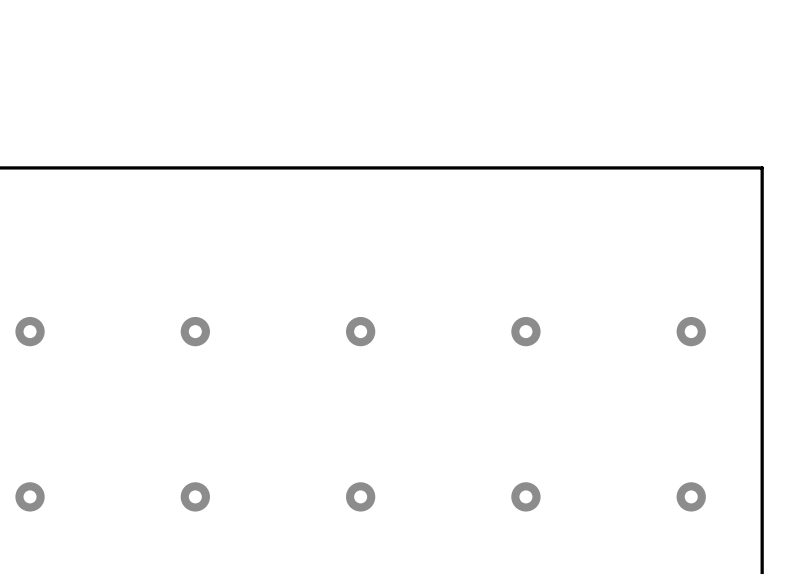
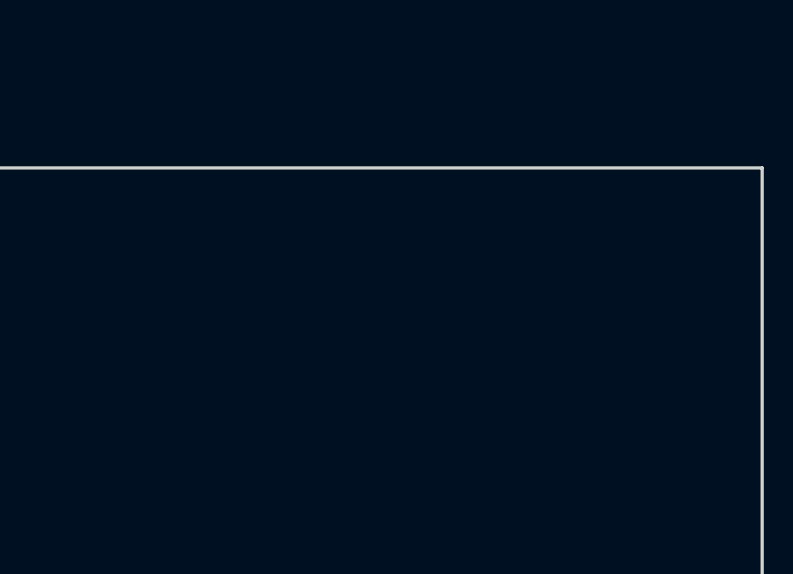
via: (30, 331) -> none
via: (195, 331) -> none
via: (360, 331) -> none
via: (525, 331) -> none
via: (691, 331) -> none
via: (30, 496) -> none
via: (195, 496) -> none
via: (360, 496) -> none
via: (525, 496) -> none
via: (691, 496) -> none

